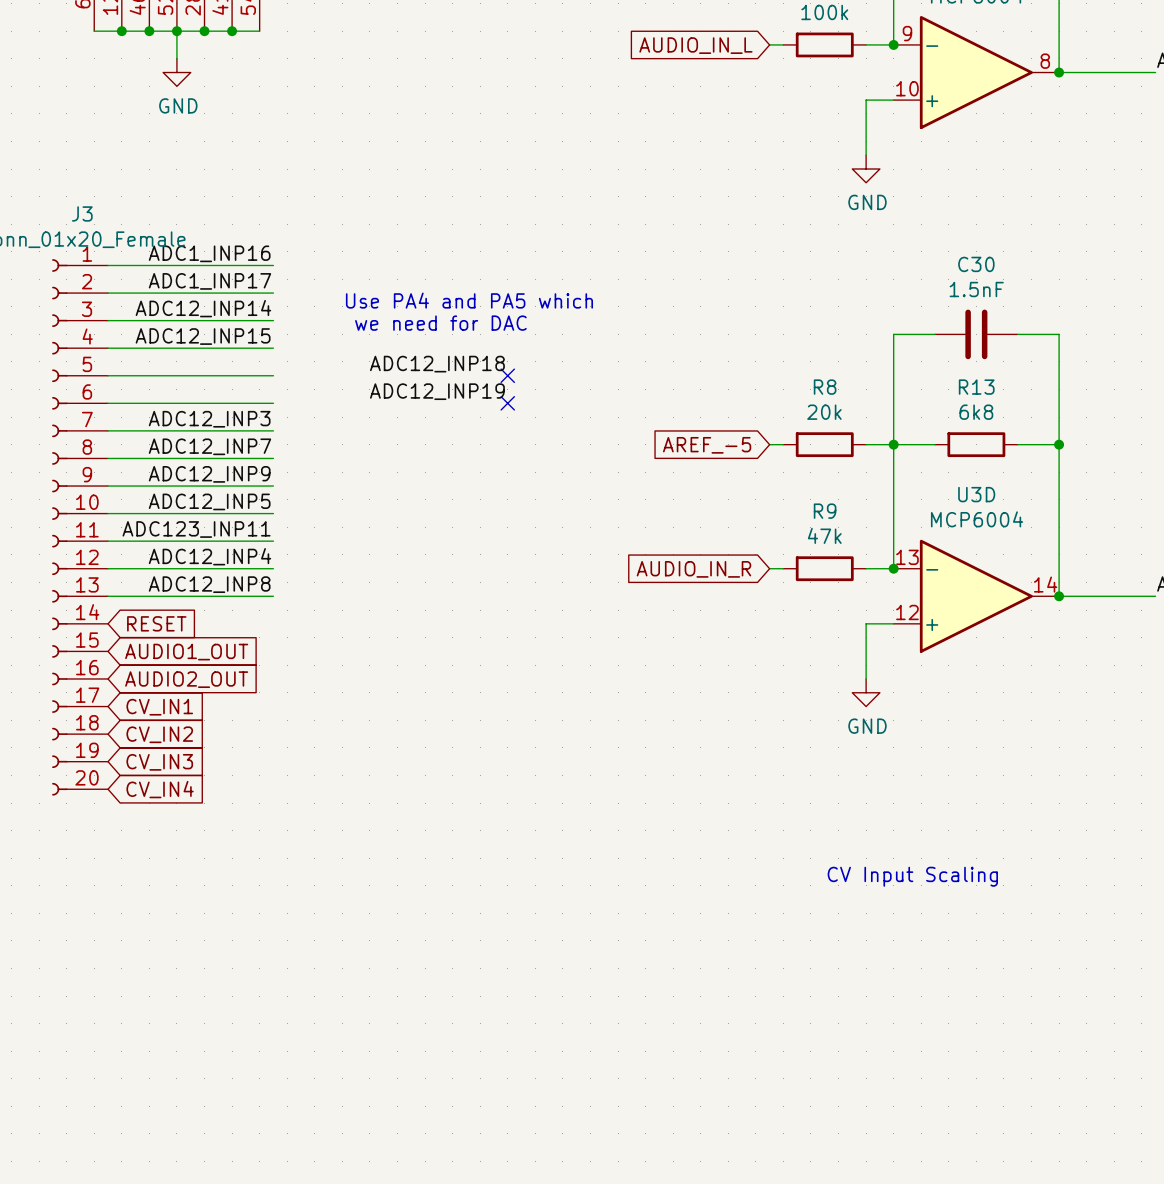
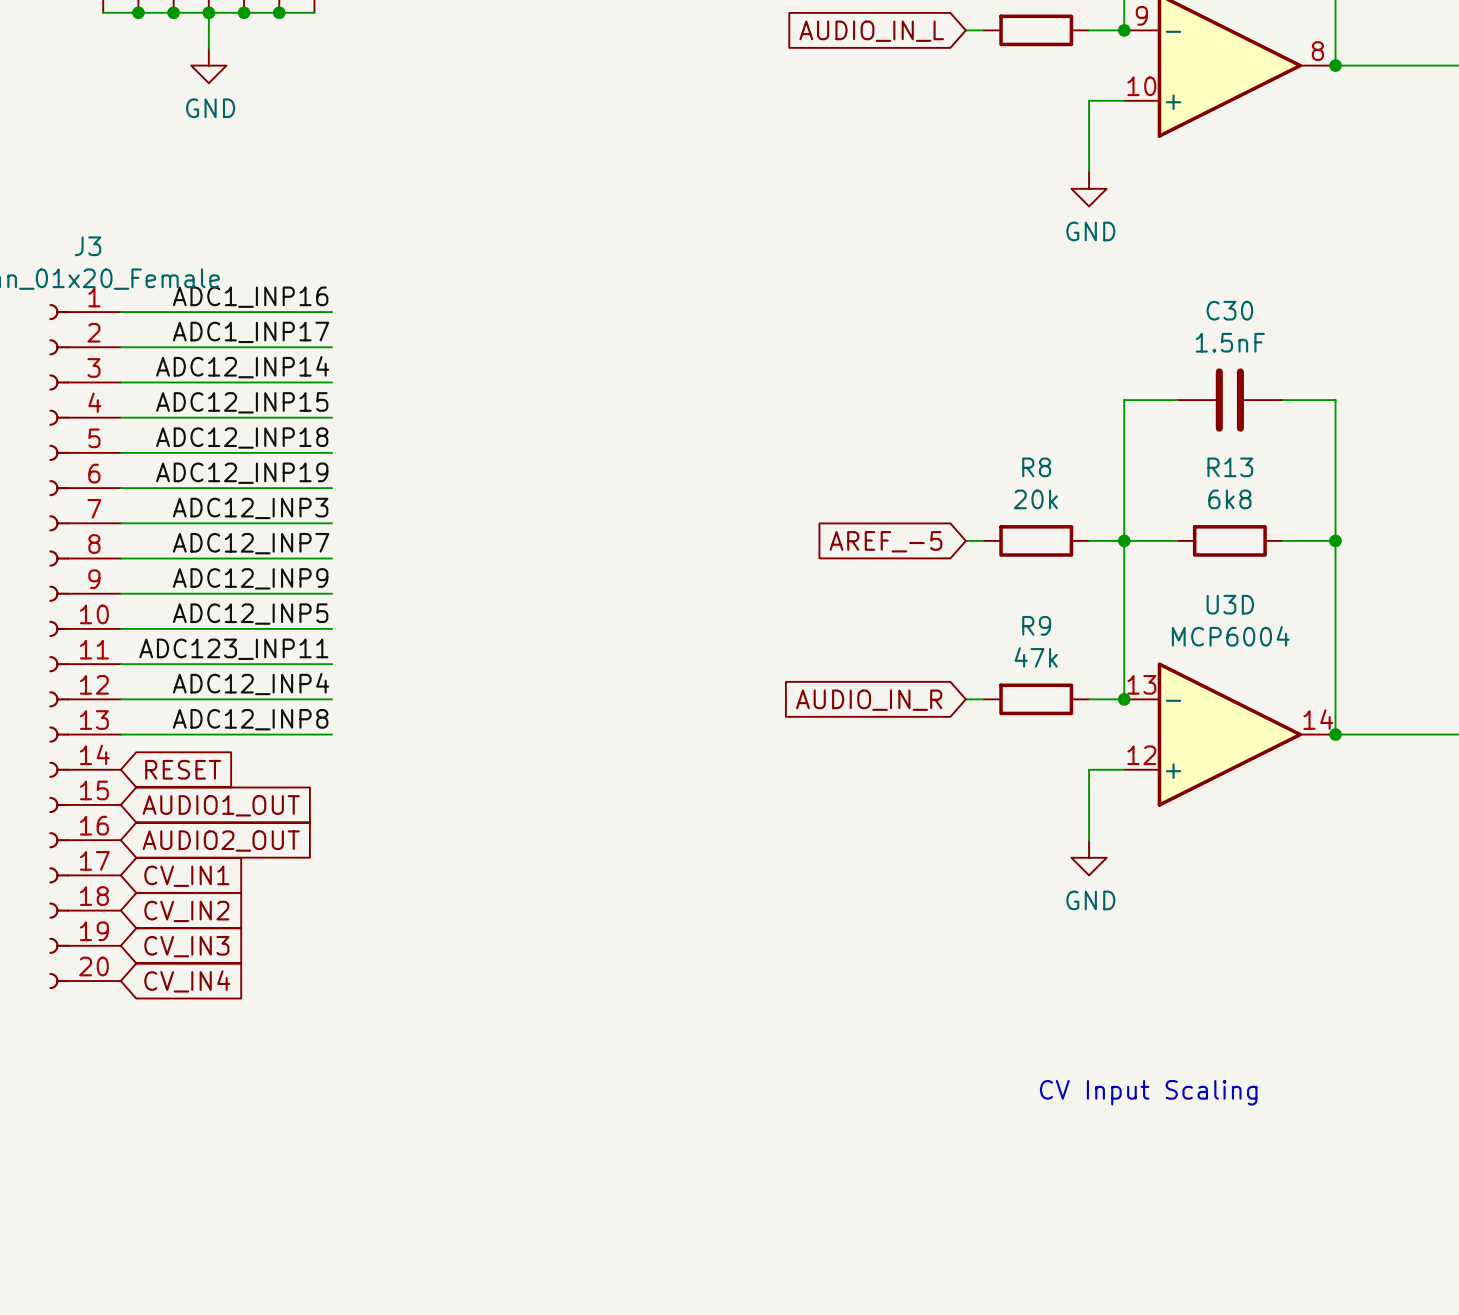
text: Use PA4 and PA5 which (469, 300) -> none
text: we need for DAC (440, 323) -> none
label position: ADC12_INP18 (437, 364) -> ADC12_INP18 (242, 438)
no-connect mark: (507, 375) -> none
label position: ADC12_INP19 (437, 391) -> ADC12_INP19 (242, 473)
no-connect mark: (507, 403) -> none

